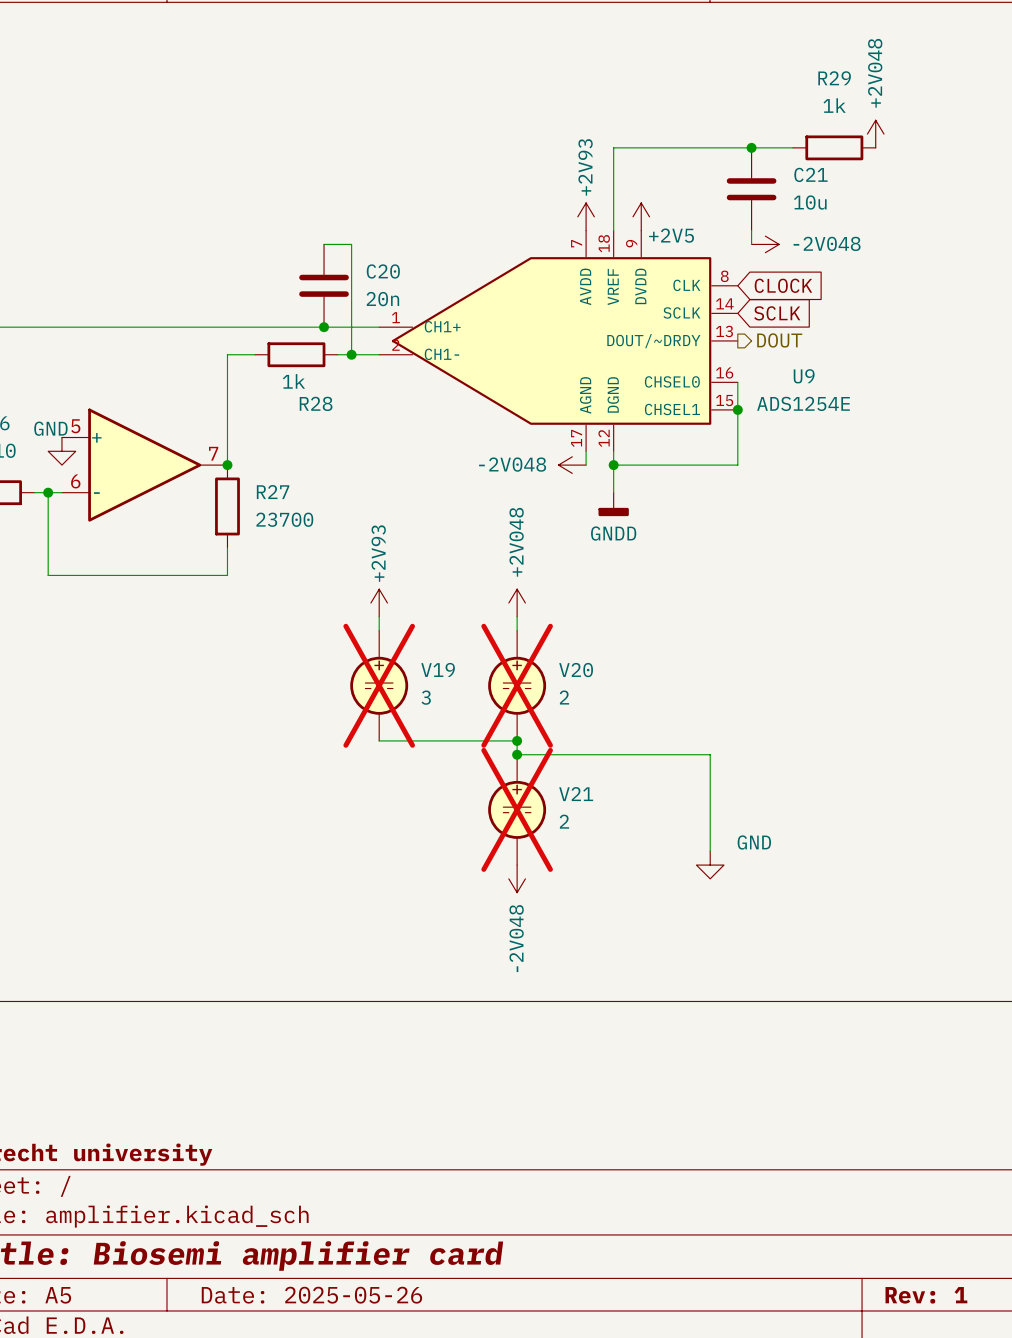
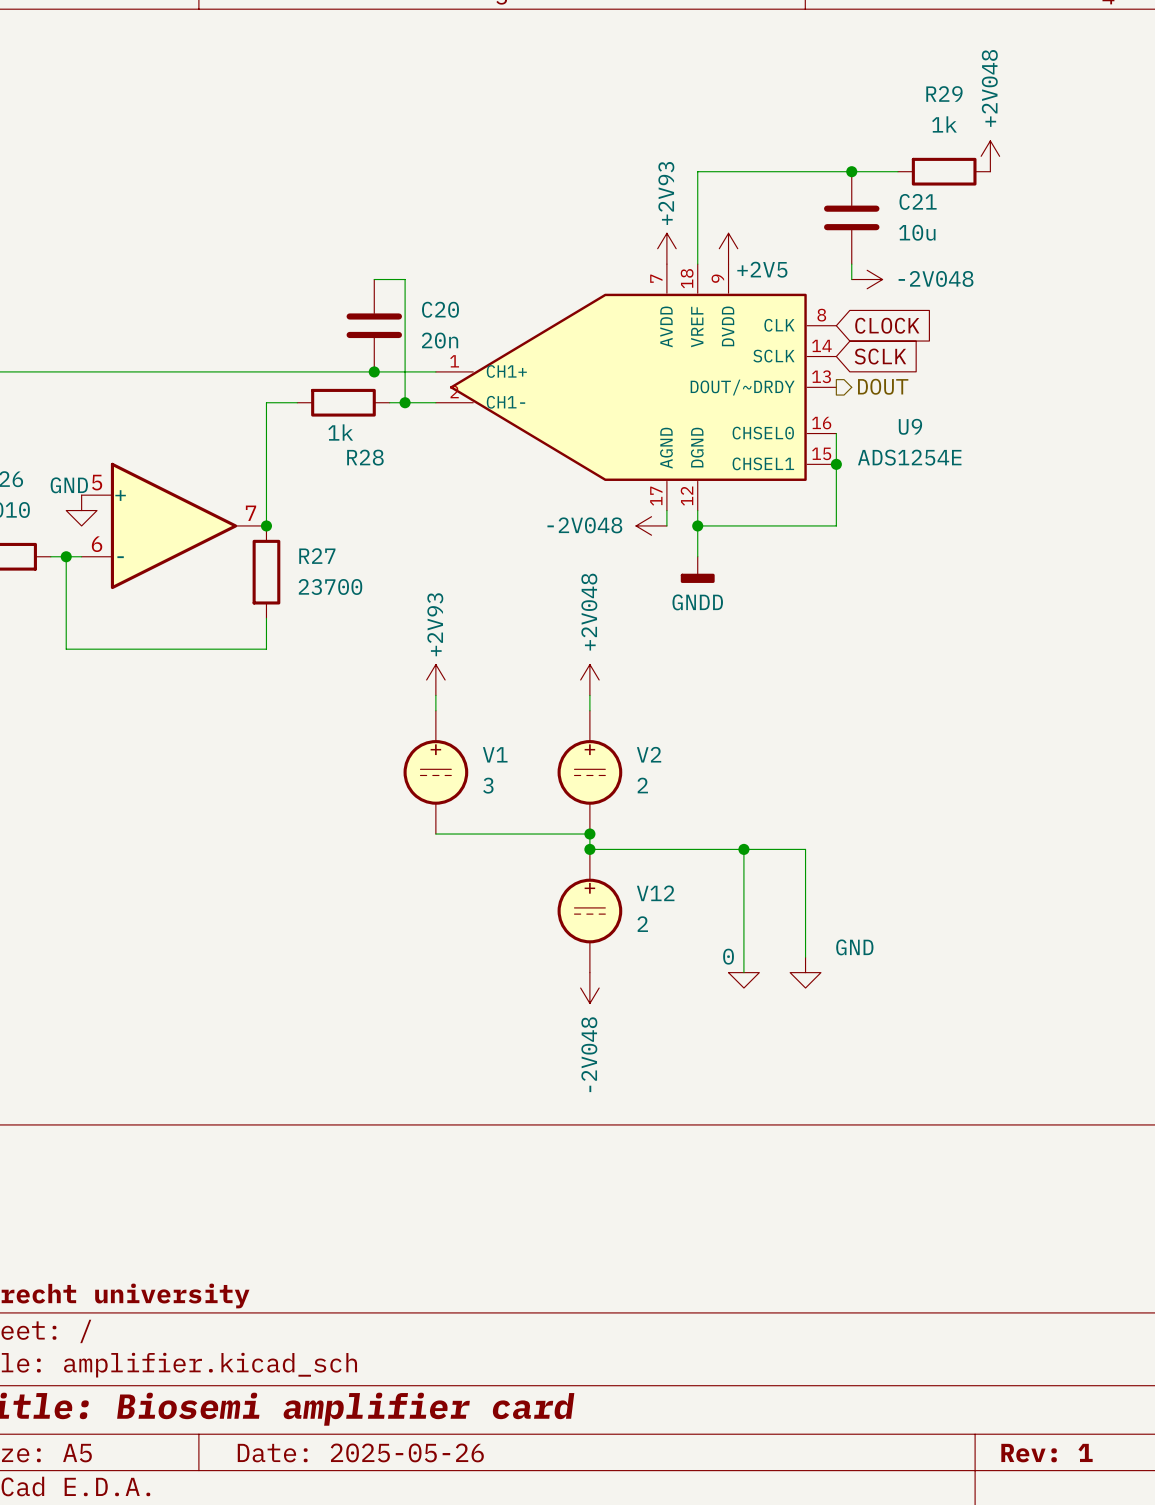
V19 name: V19 (438, 669) -> V1 (495, 754)
V20 name: V20 (576, 670) -> V2 (649, 754)
V19 do-not-place cross: (379, 685) -> none
V20 do-not-place cross: (517, 685) -> none
wire: none -> (743, 849) (743, 972)
junction: none -> (743, 849)
V21 name: V21 (576, 794) -> V12 (655, 893)
V21 do-not-place cross: (517, 809) -> none
power symbol: none -> 0 (743, 980)

